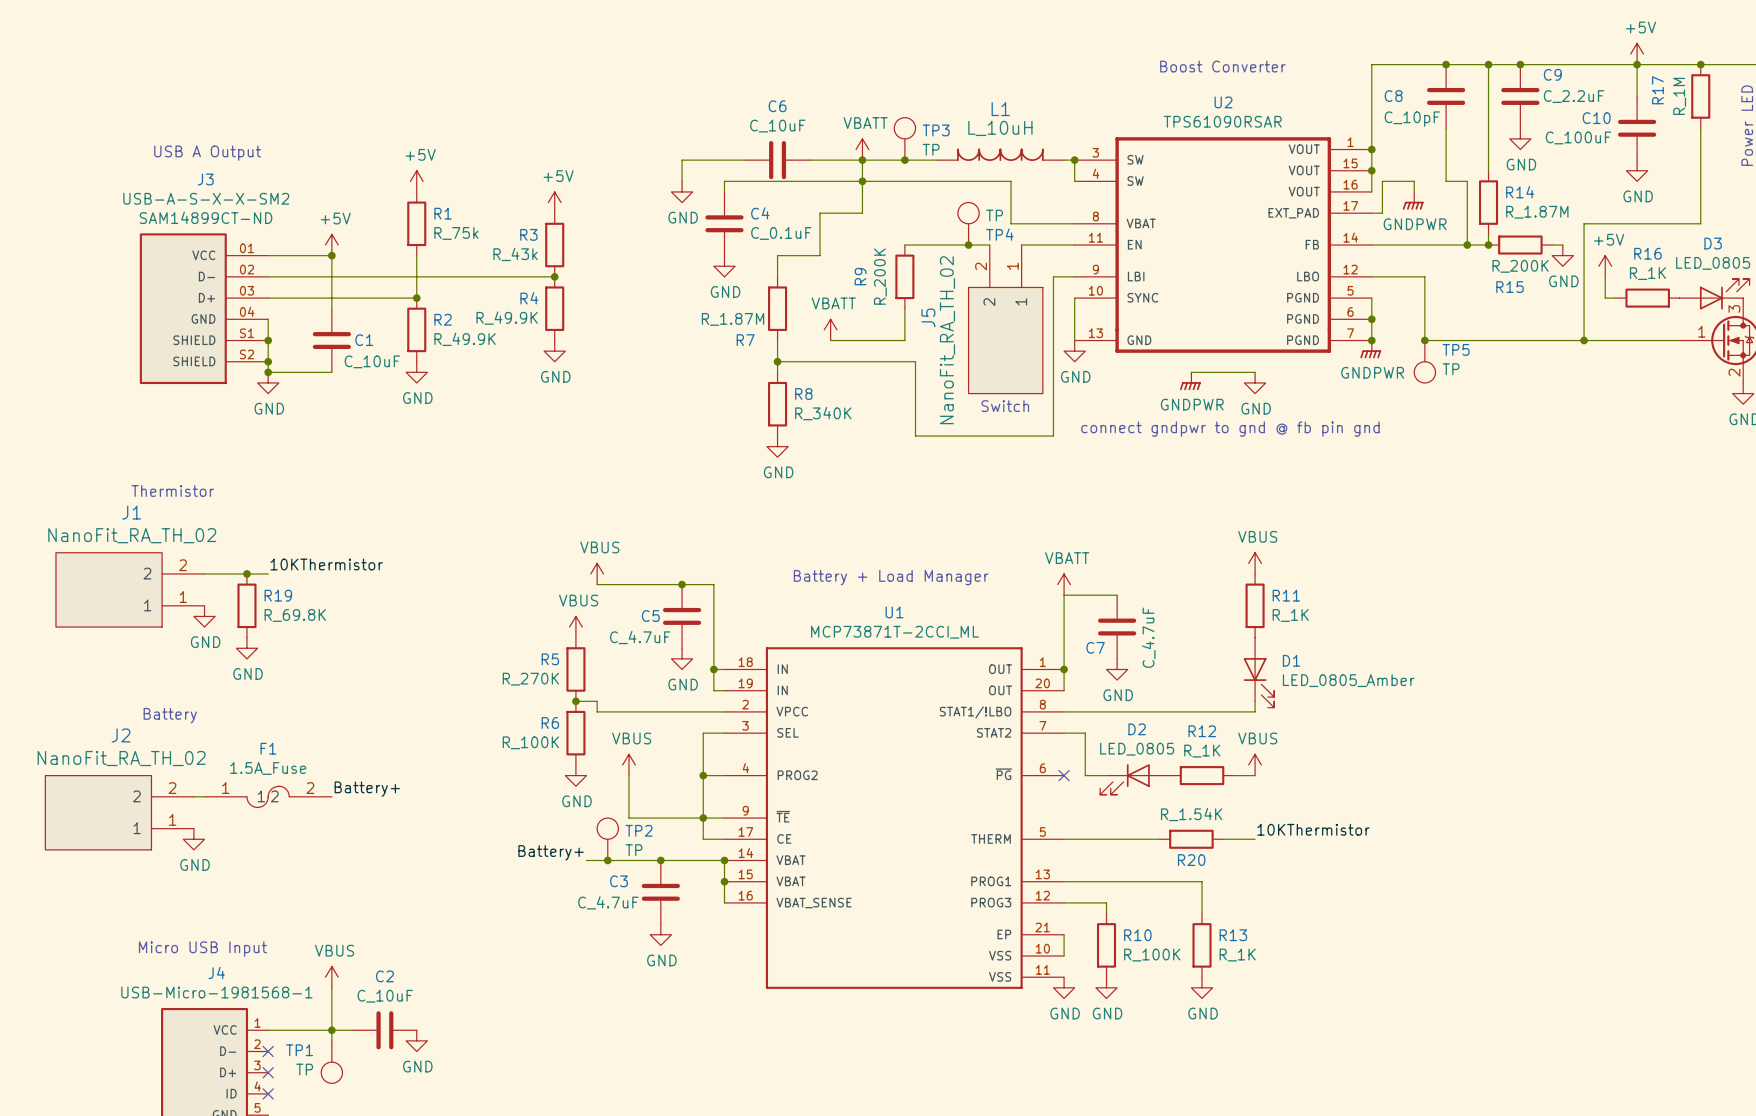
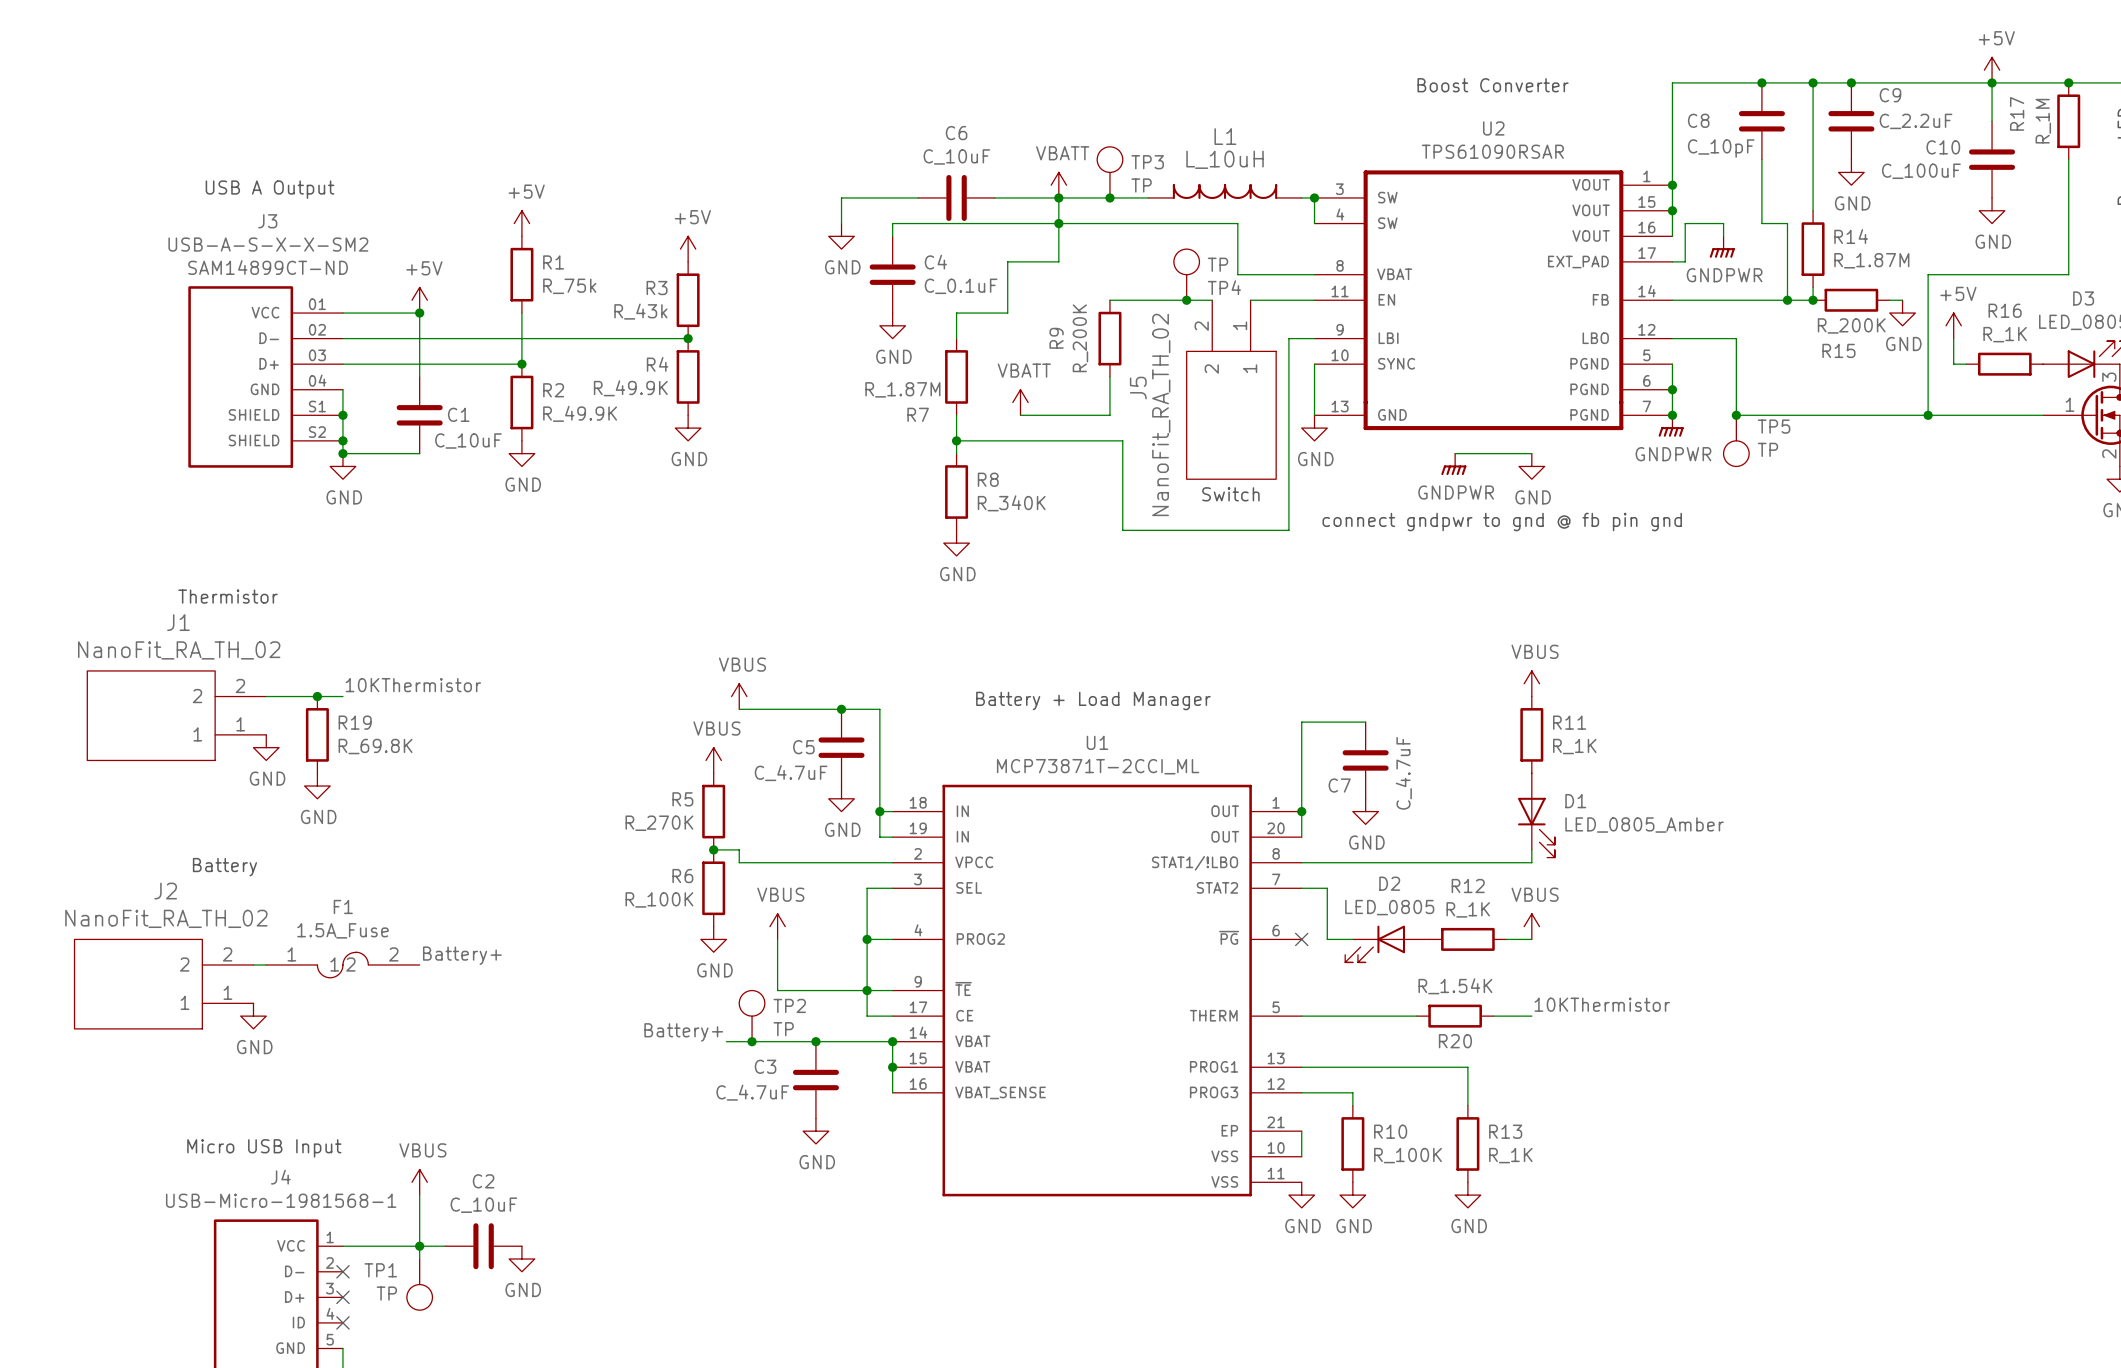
power symbol: VBATT (1064, 584) -> none

